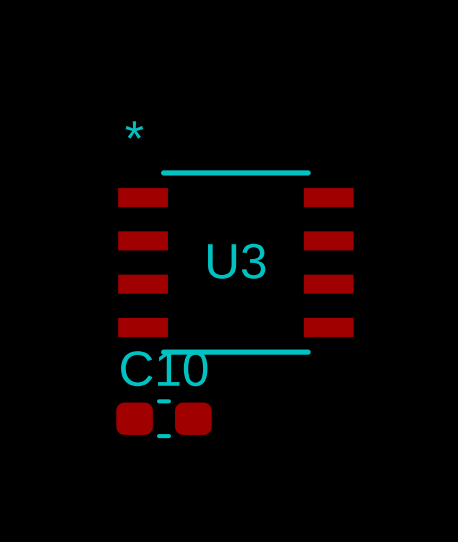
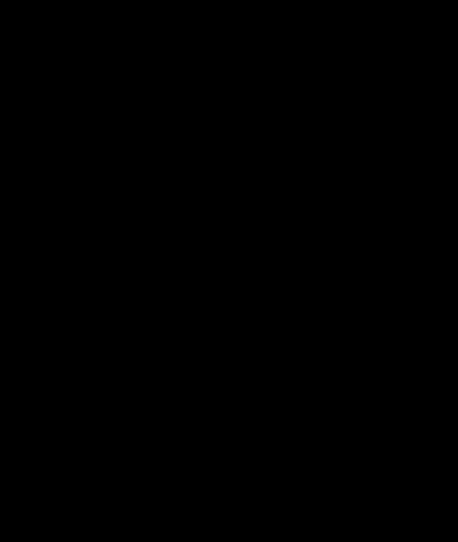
U3: (235, 262) -> none
C10: (163, 418) -> none

